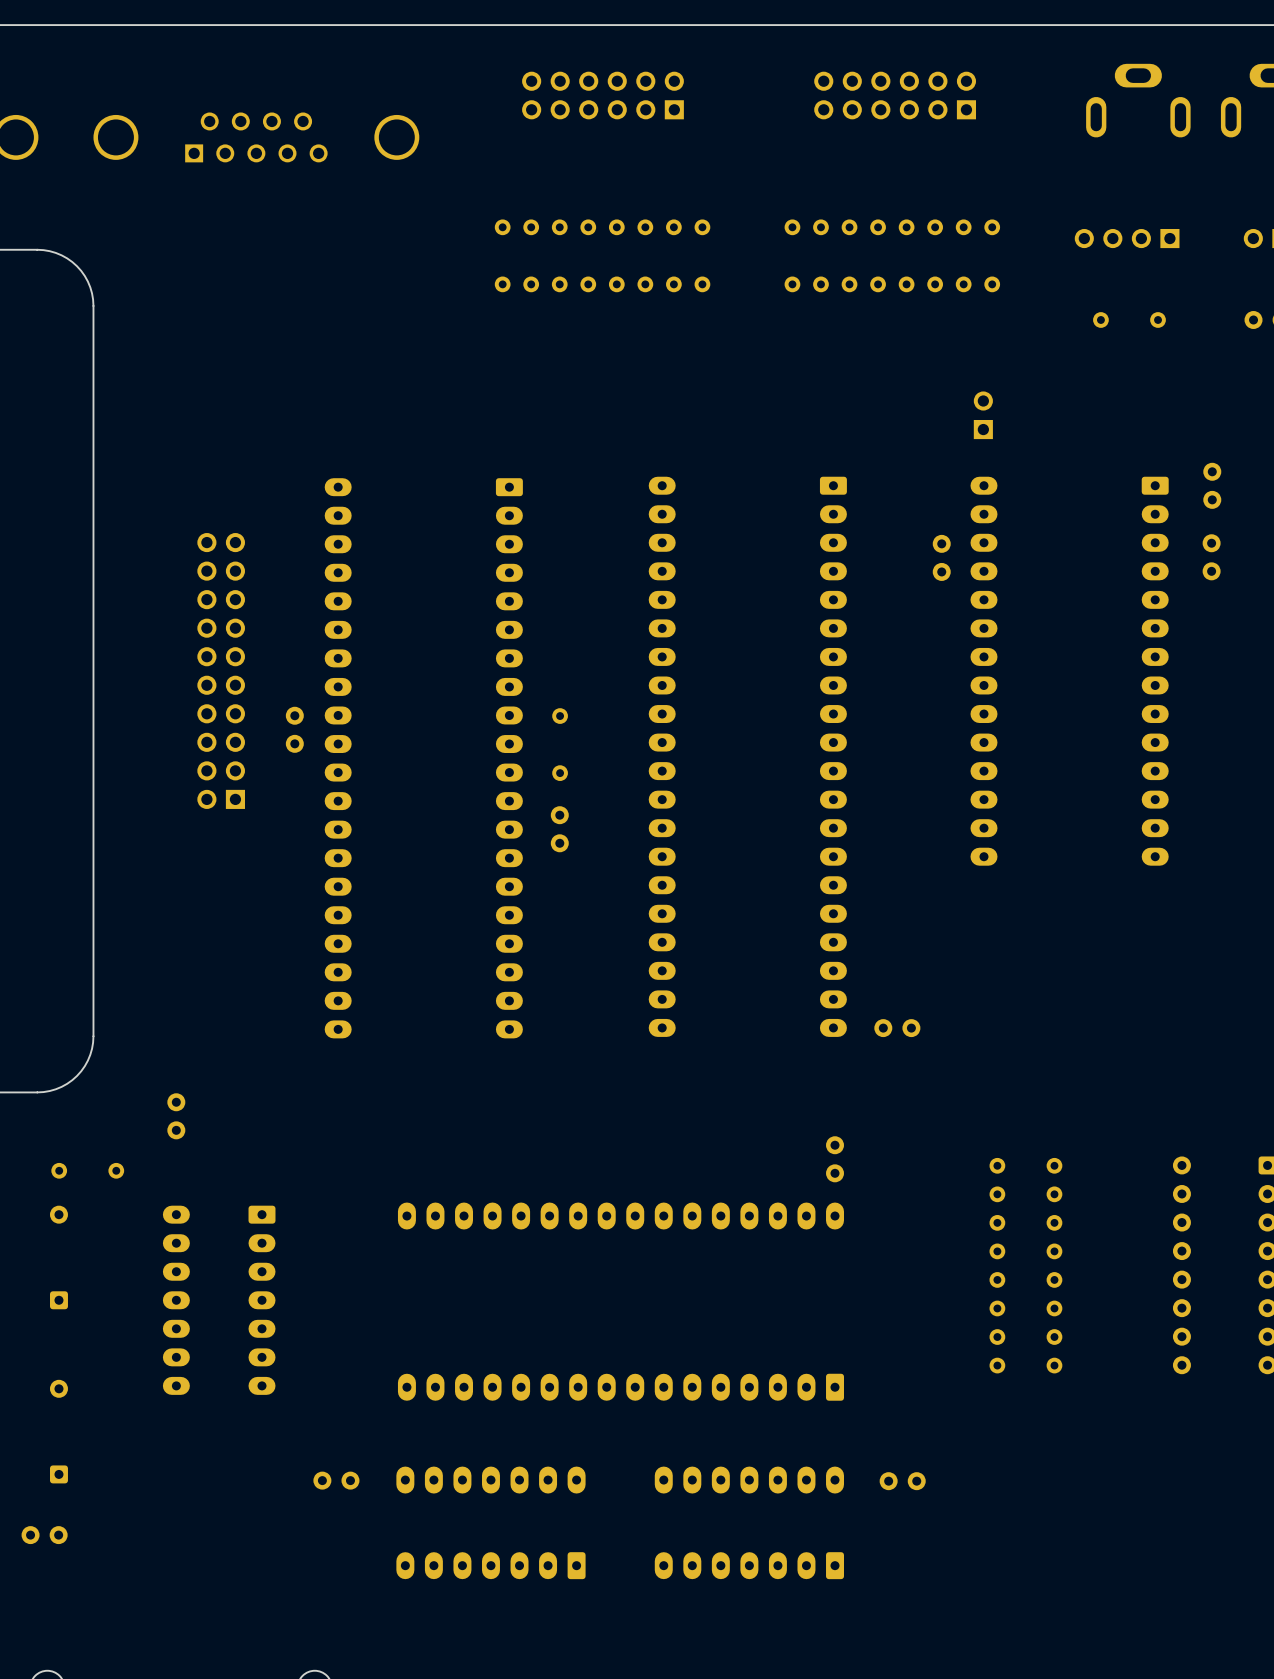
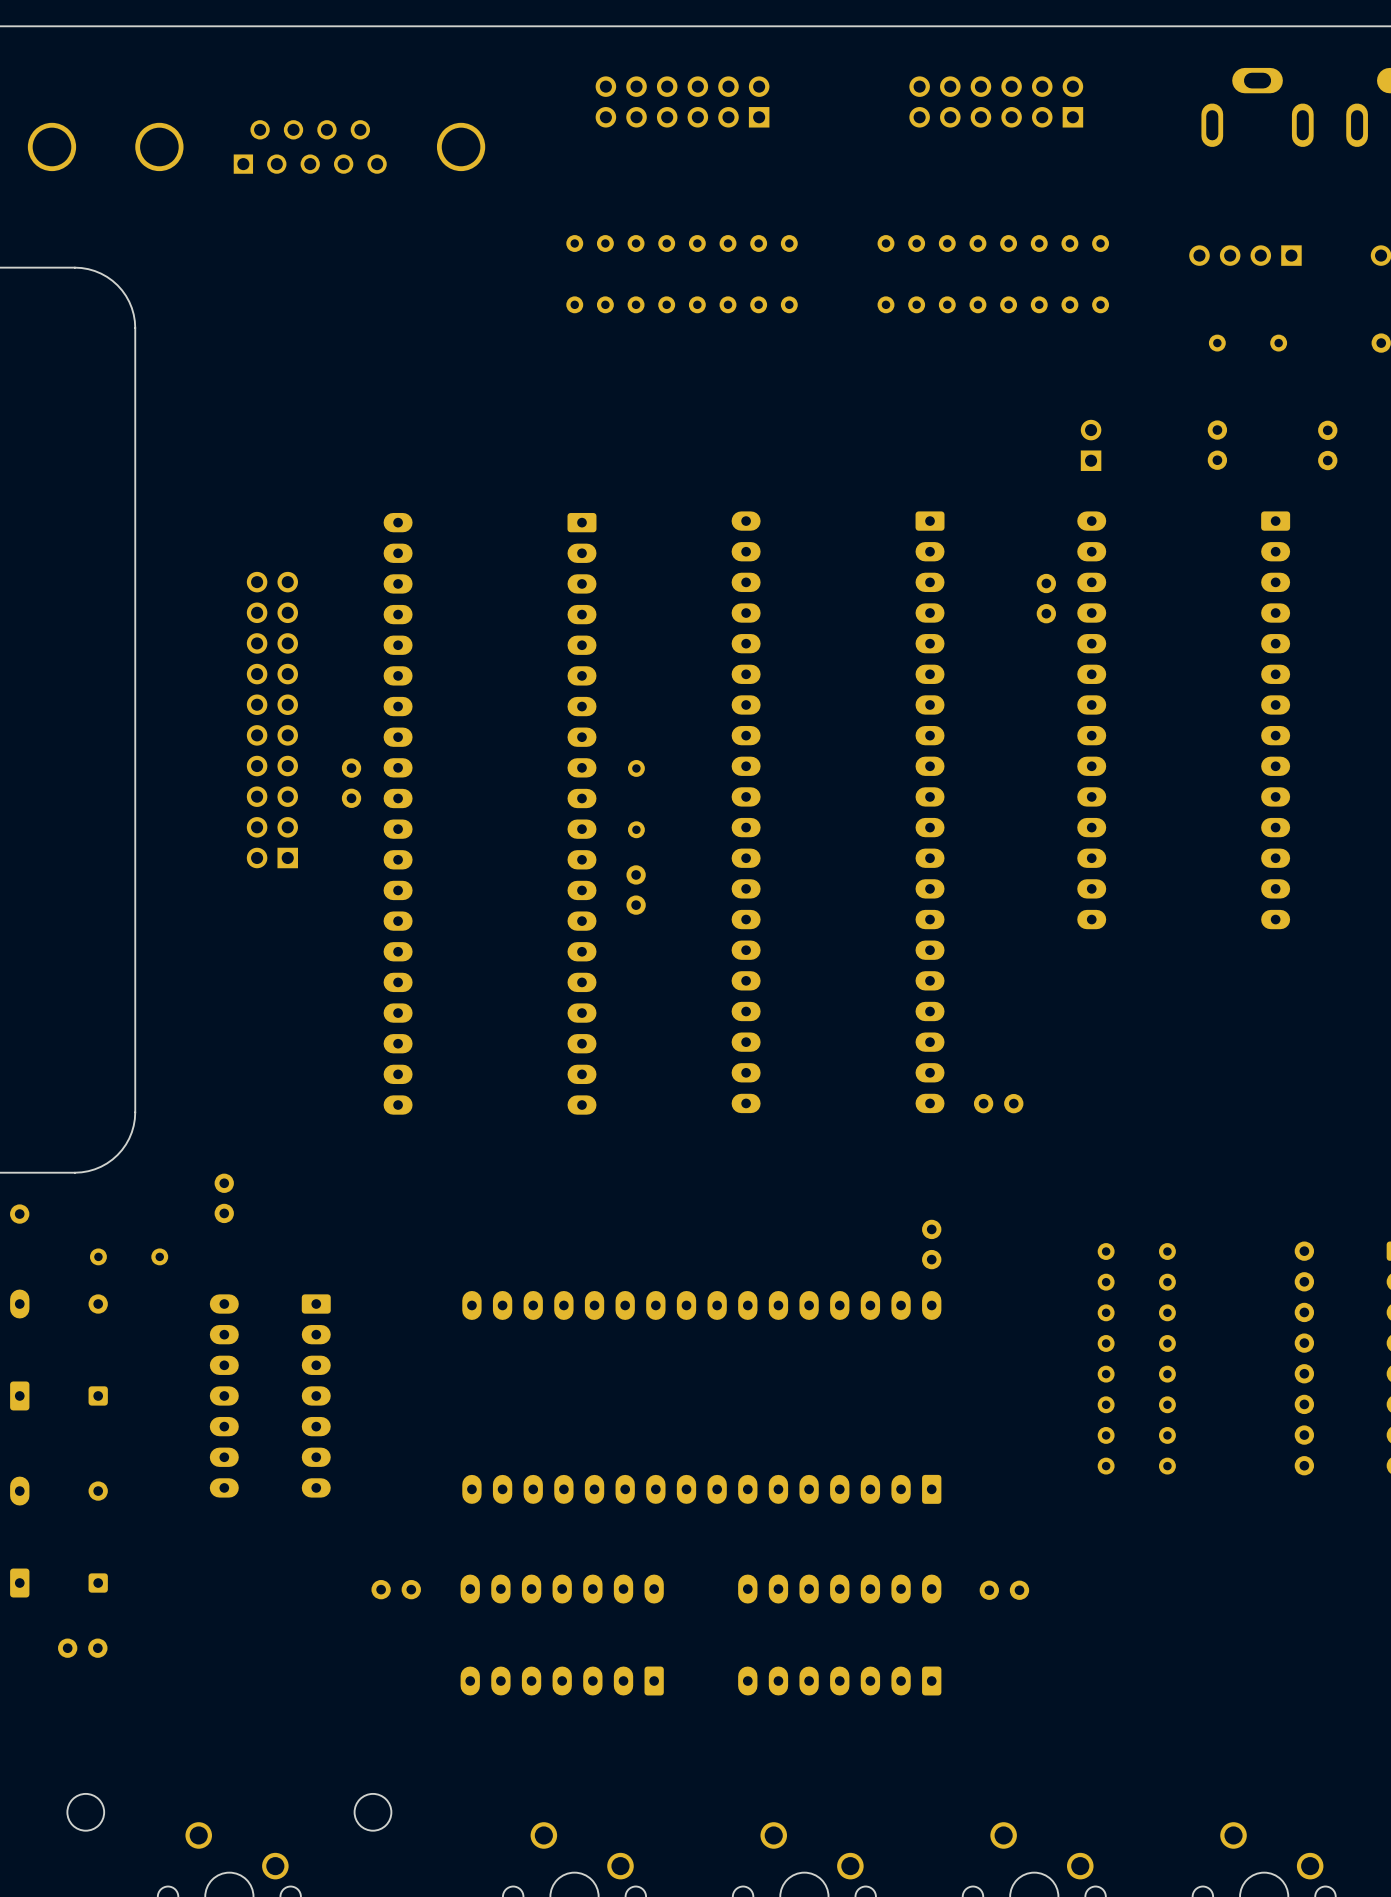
part: none -> (1217, 445)
part: none -> (1327, 445)
part: (1212, 485) -> none
part: (1211, 557) -> none

